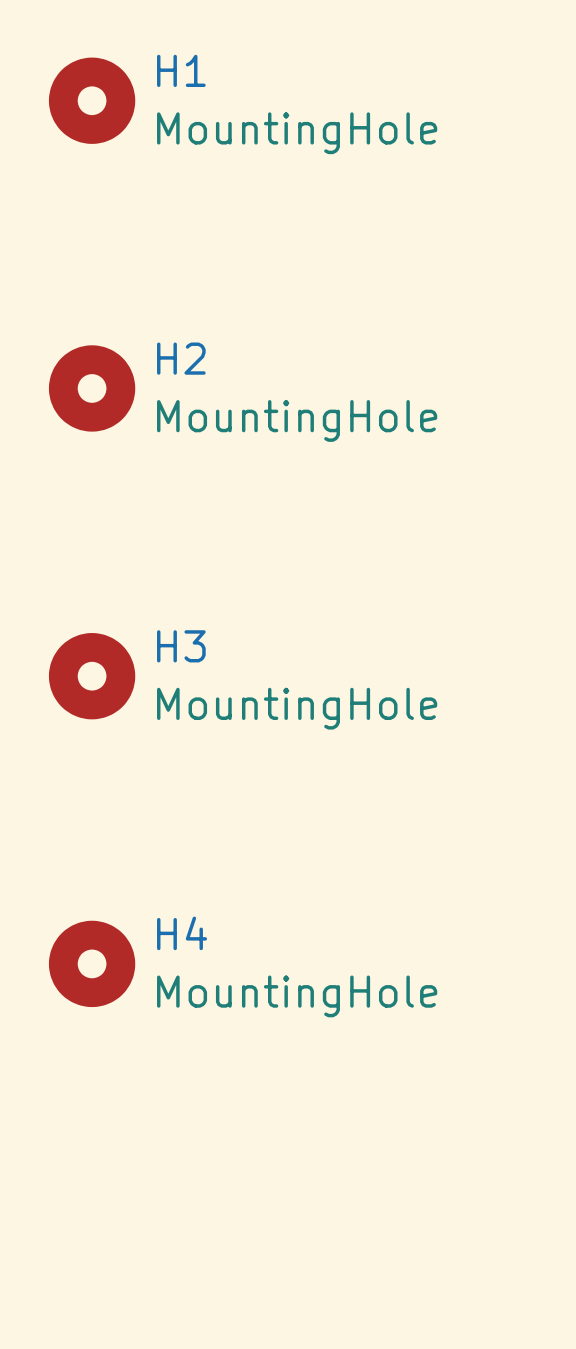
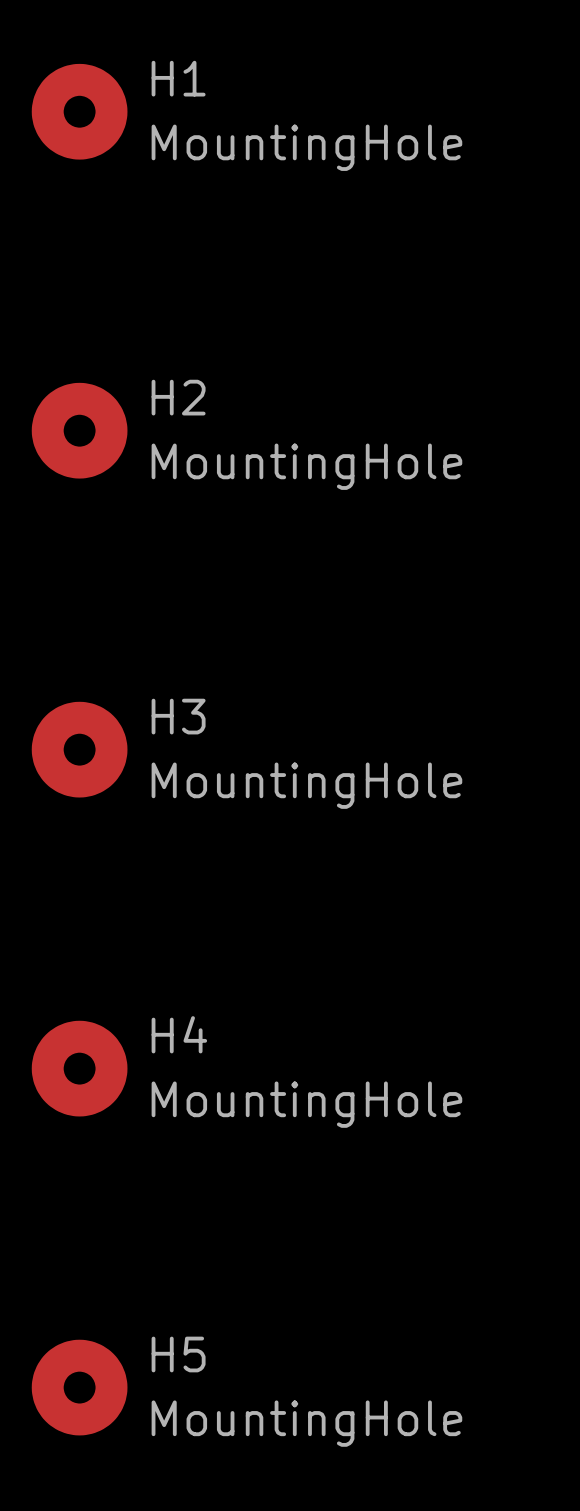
H5: none -> MountingHole (79, 1387)

